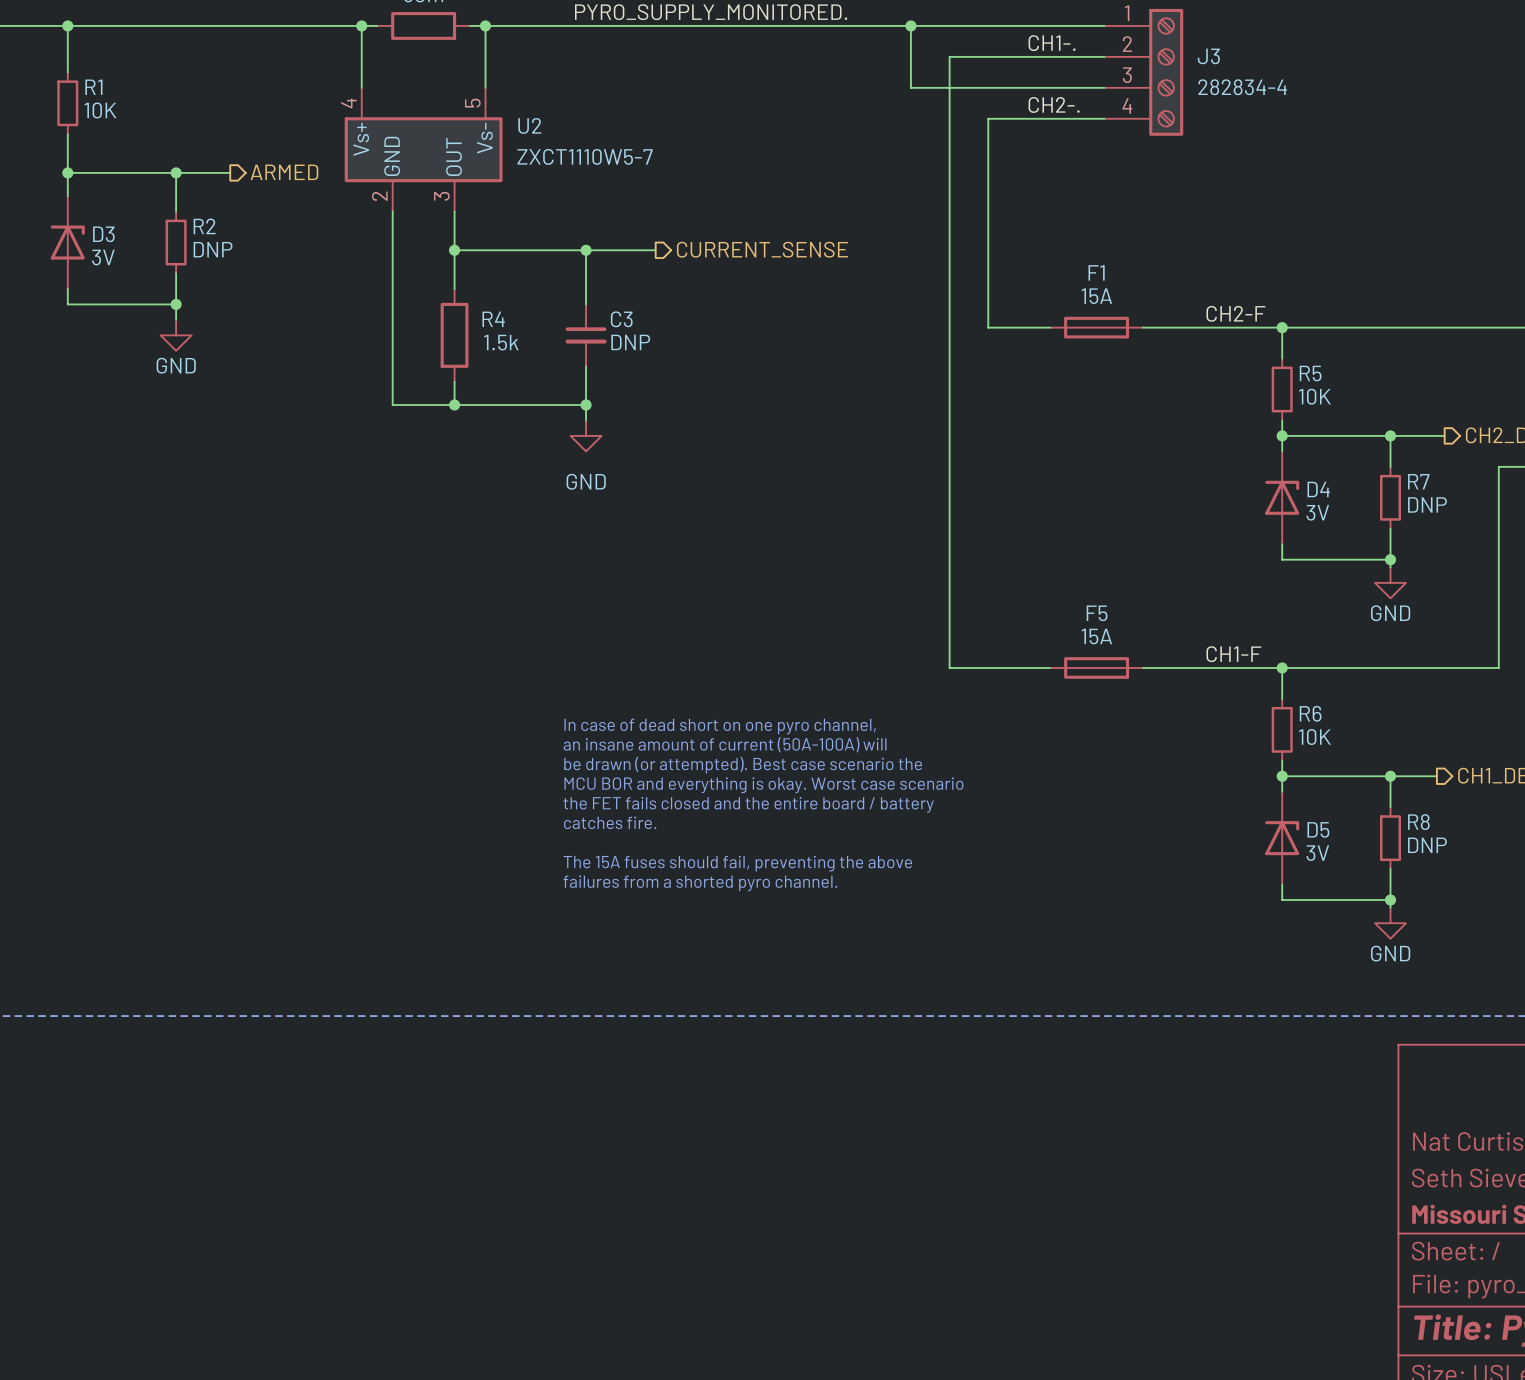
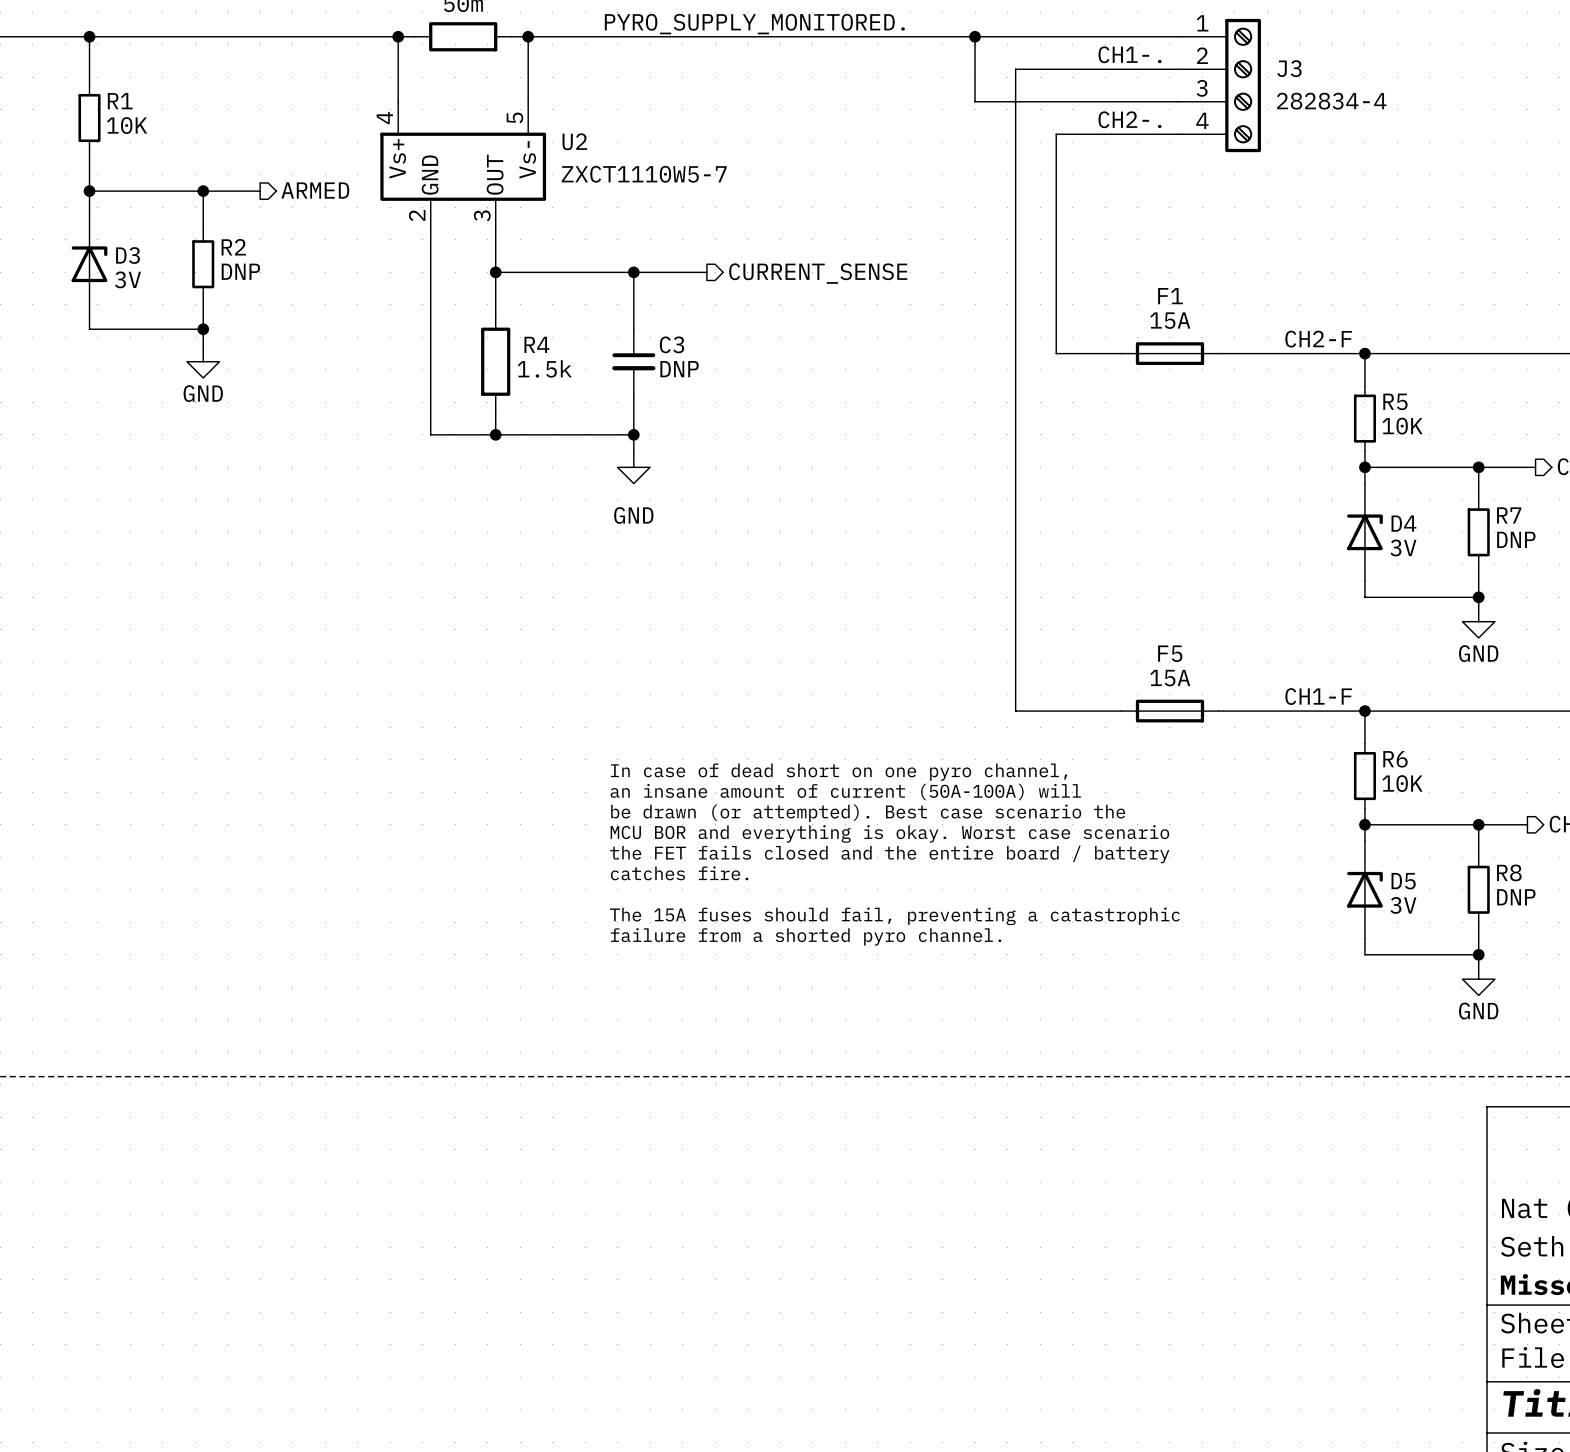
text: The 15A fuses should fail, preventing the above (737, 863) -> The 15A fuses should fail, preventing a catastrophic (894, 916)
text: failures from a shorted pyro channel. (700, 883) -> failure from a shorted pyro channel. (806, 936)

